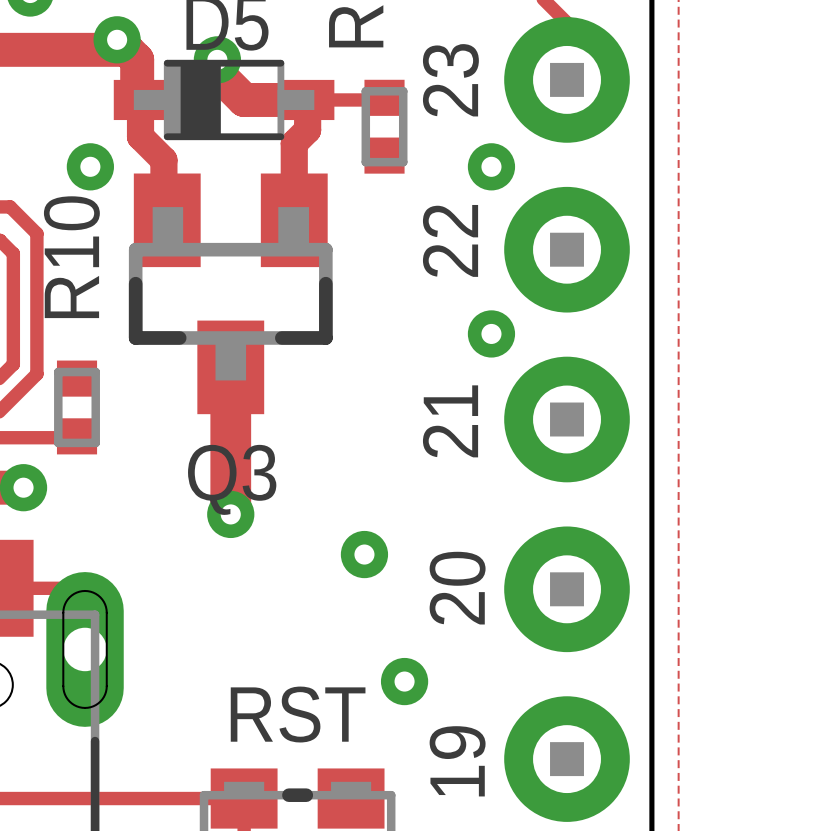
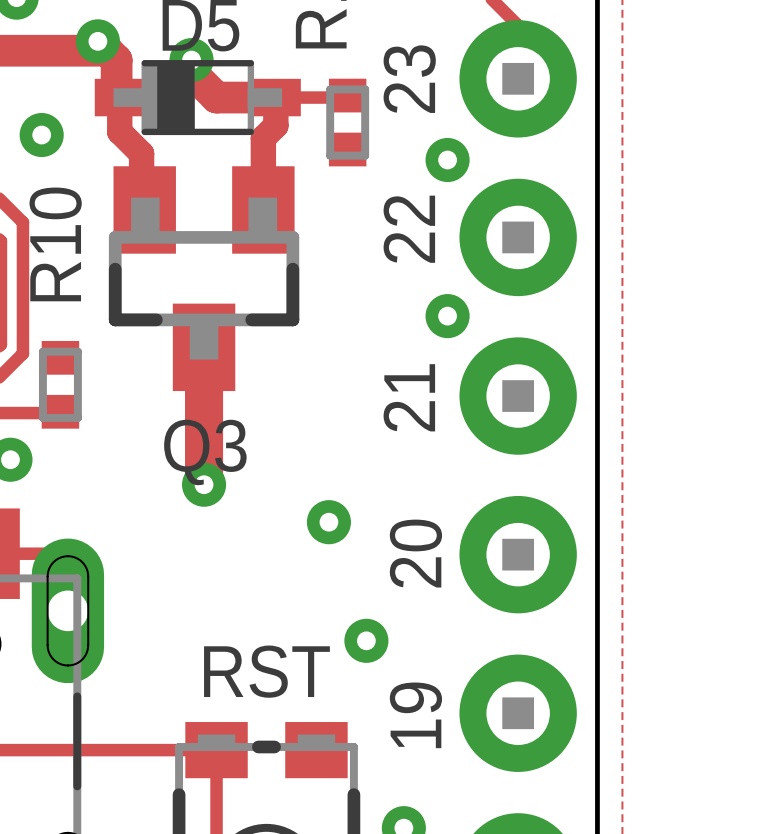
via position: (90, 166) -> (41, 135)

